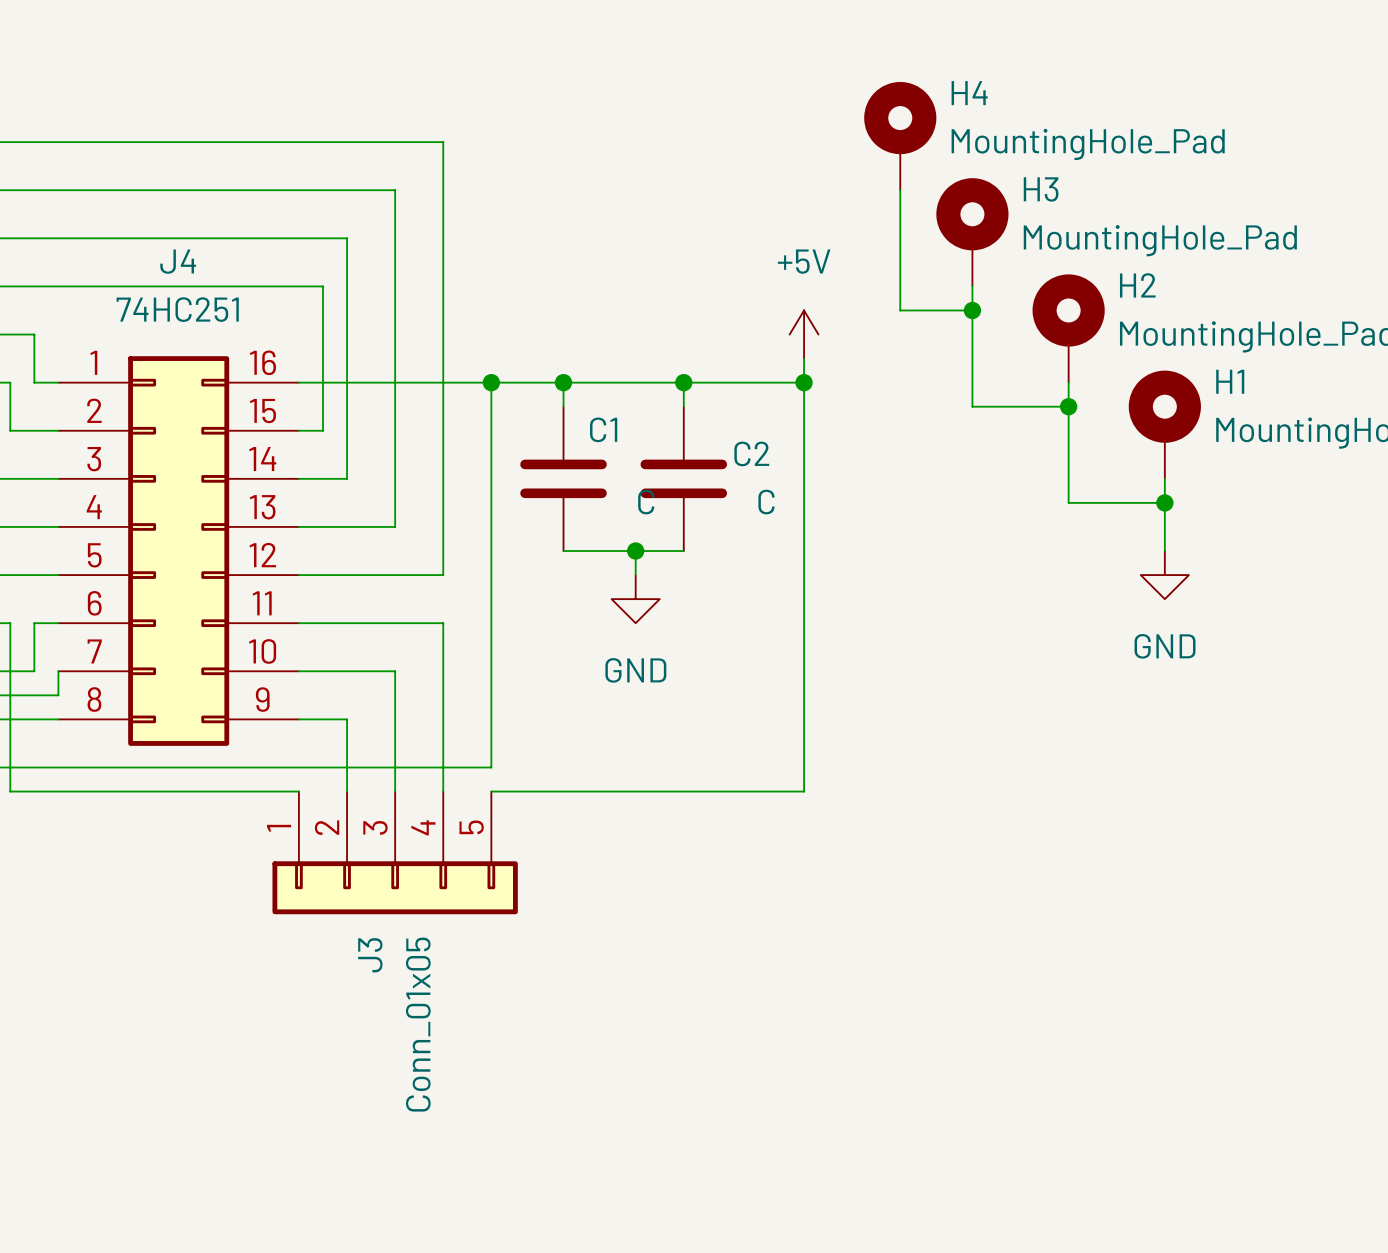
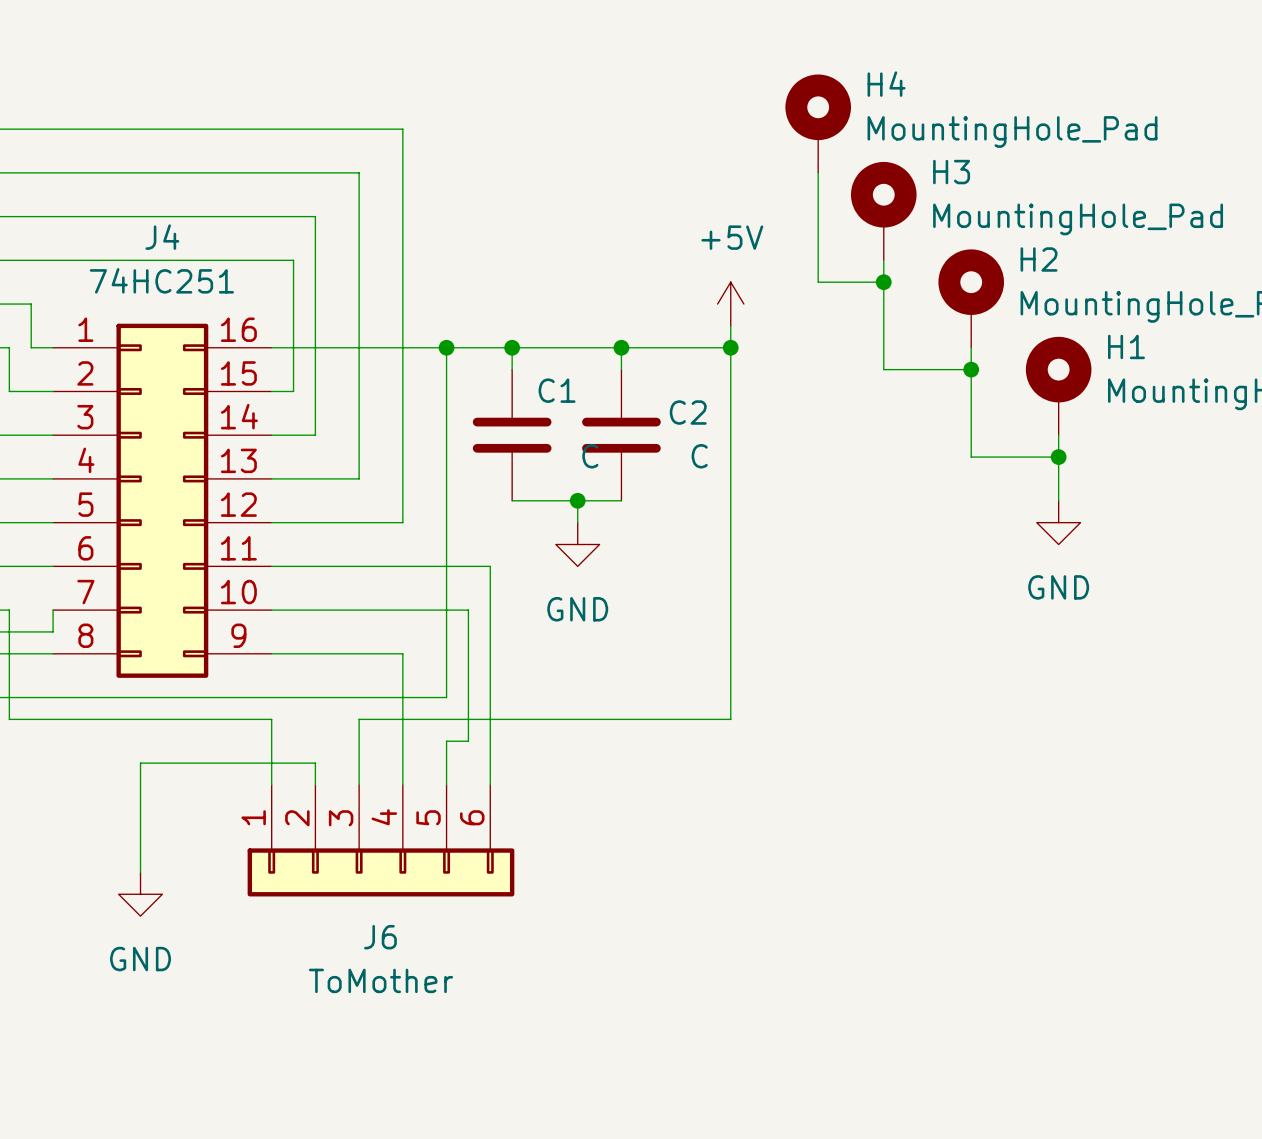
wire: (10, 623) (10, 671) (34, 671) (34, 623) -> (9, 566) (31, 566)
wire: (443, 623) (443, 719) -> (402, 566) (490, 566) (490, 784)
wire: (395, 671) (395, 791) -> (359, 610) (468, 610) (468, 741) (446, 741) (446, 784)
wire: (347, 719) (347, 791) -> (315, 653) (402, 653)
wire: none -> (446, 719) (359, 719) (359, 784)
J3: Conn_01x05 (395, 852) -> none
wire: none -> (315, 784) (315, 763) (140, 763) (140, 872)
J6: none -> ToMother (380, 840)
power symbol: none -> GND (140, 894)

